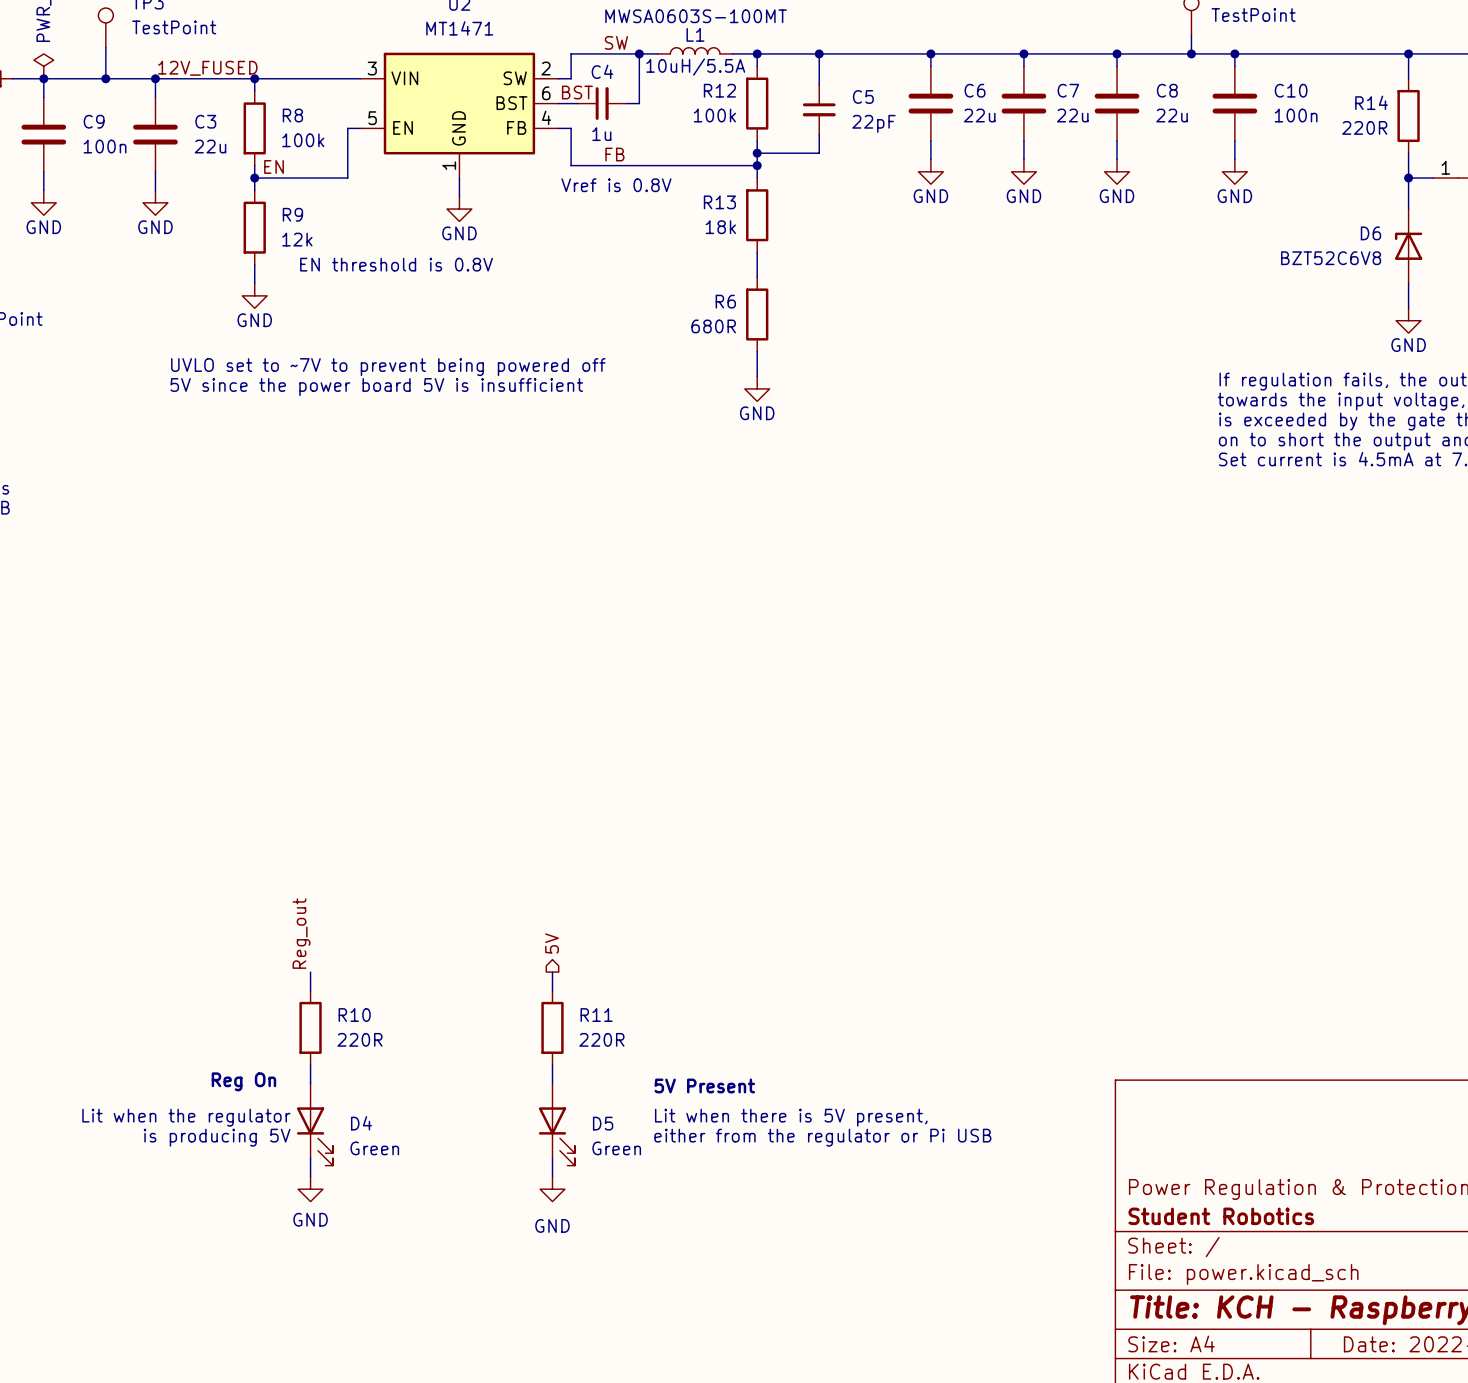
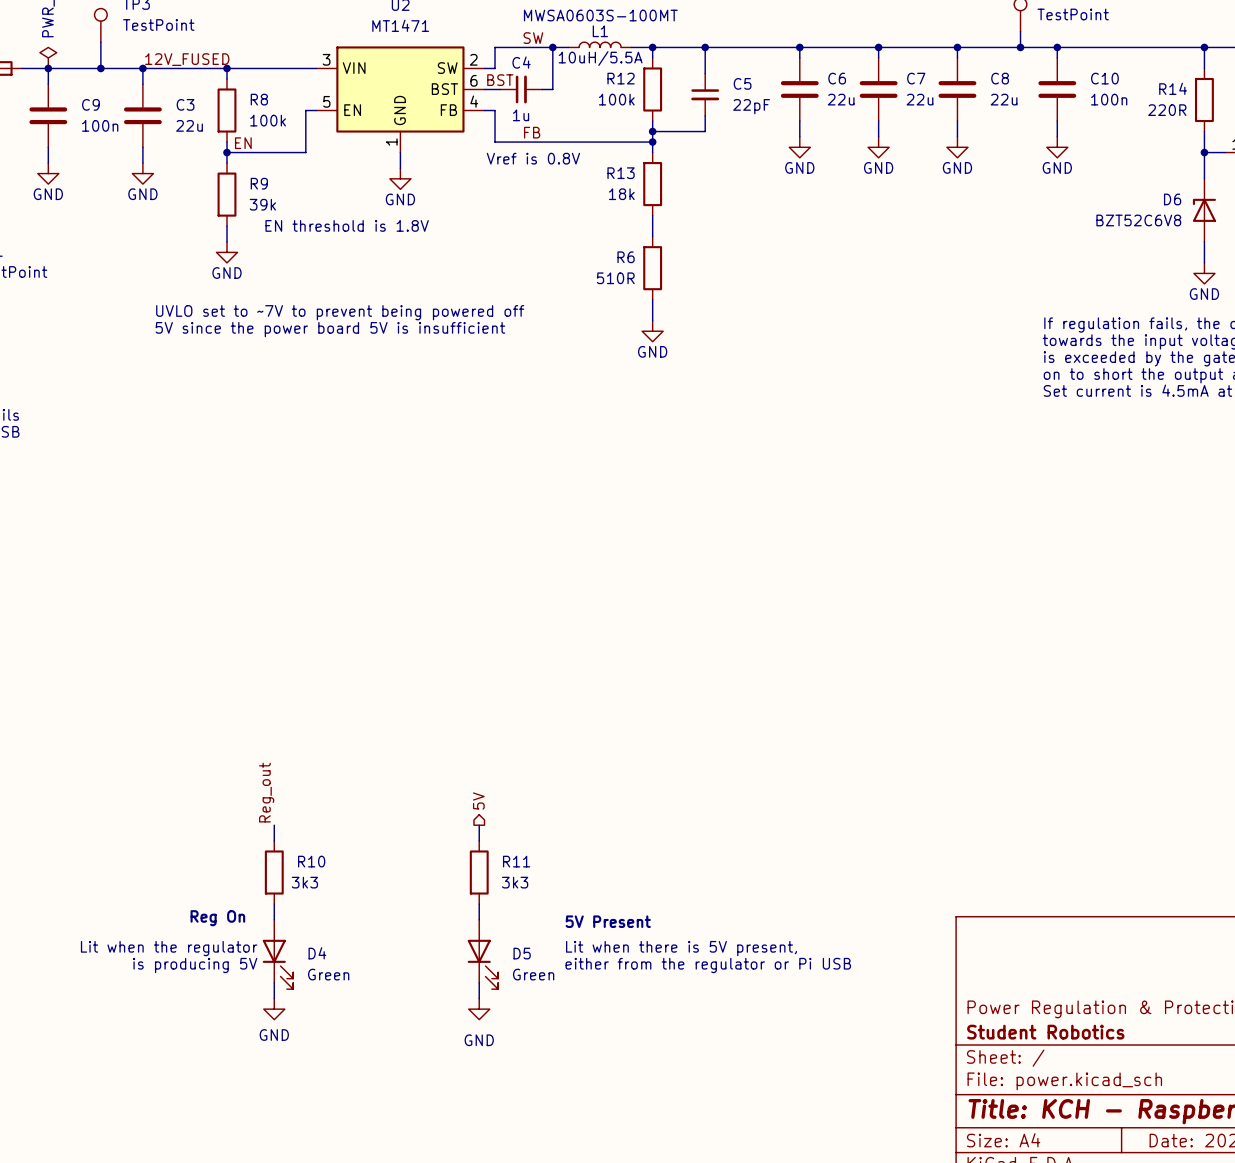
R9 value: 12k (297, 239) -> 39k (262, 204)
text: EN threshold is 0.8V (396, 264) -> EN threshold is 1.8V (347, 225)
R6 value: 680R (713, 326) -> 510R (615, 278)
R10 value: 220R (359, 1039) -> 3k3 (304, 882)
R11 value: 220R (601, 1039) -> 3k3 (515, 882)

